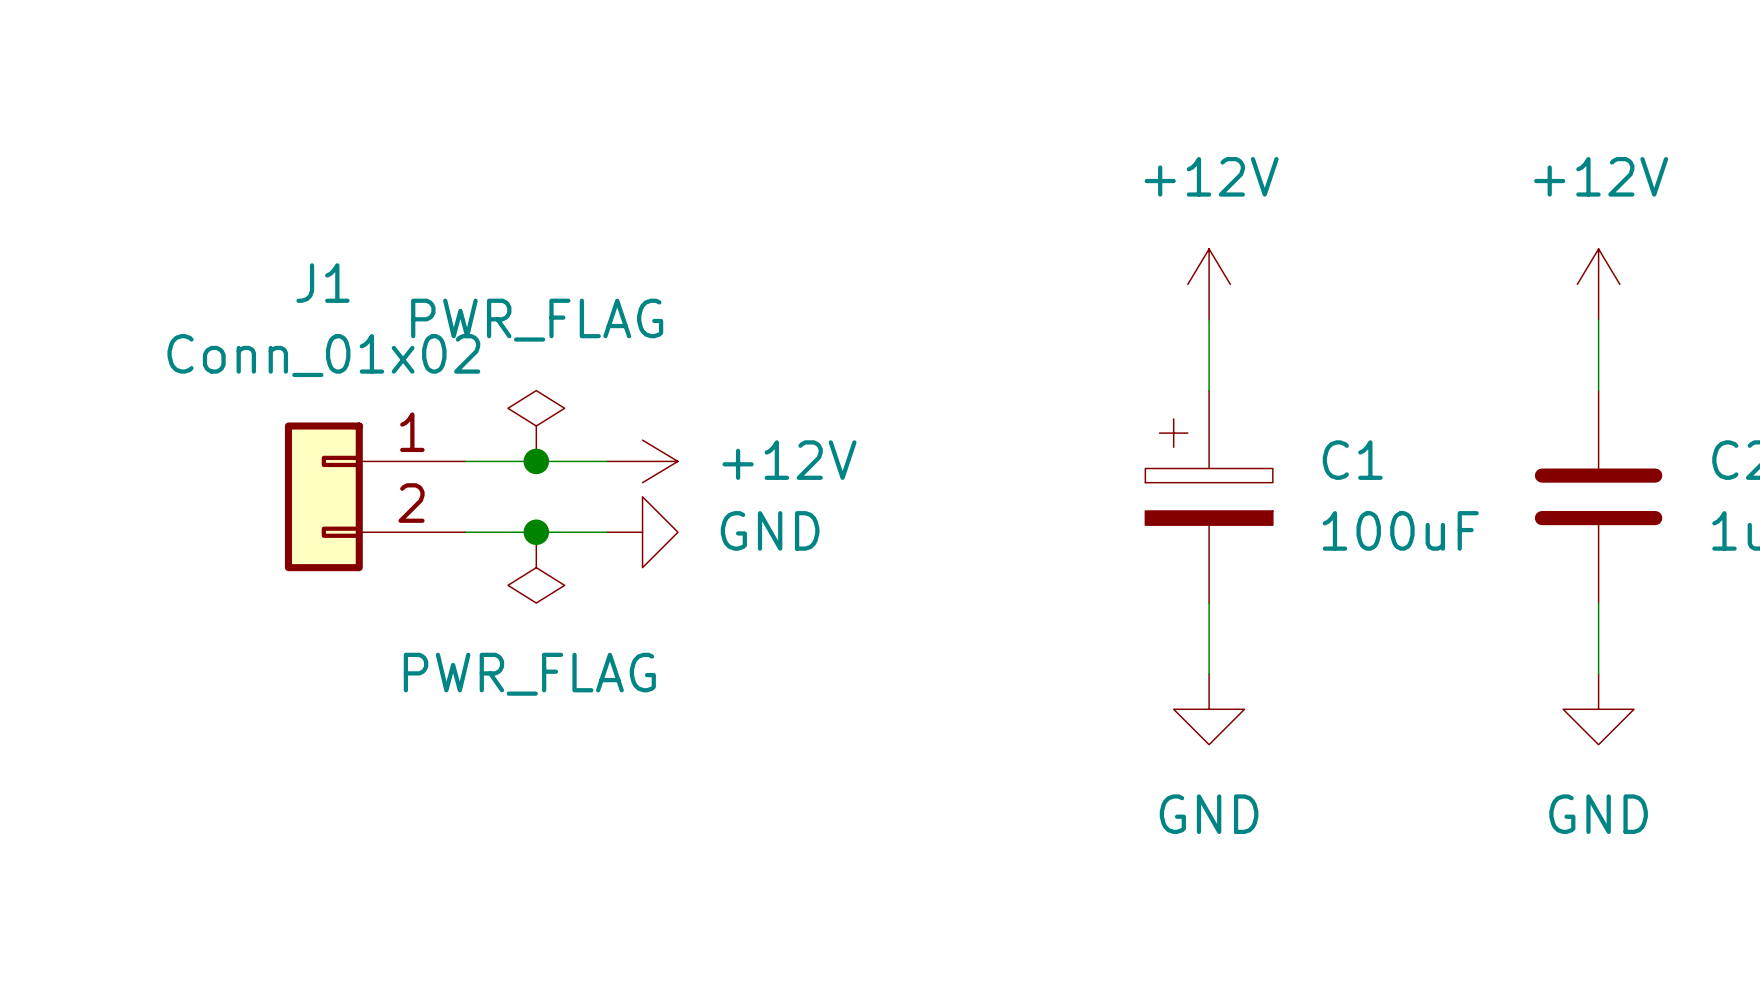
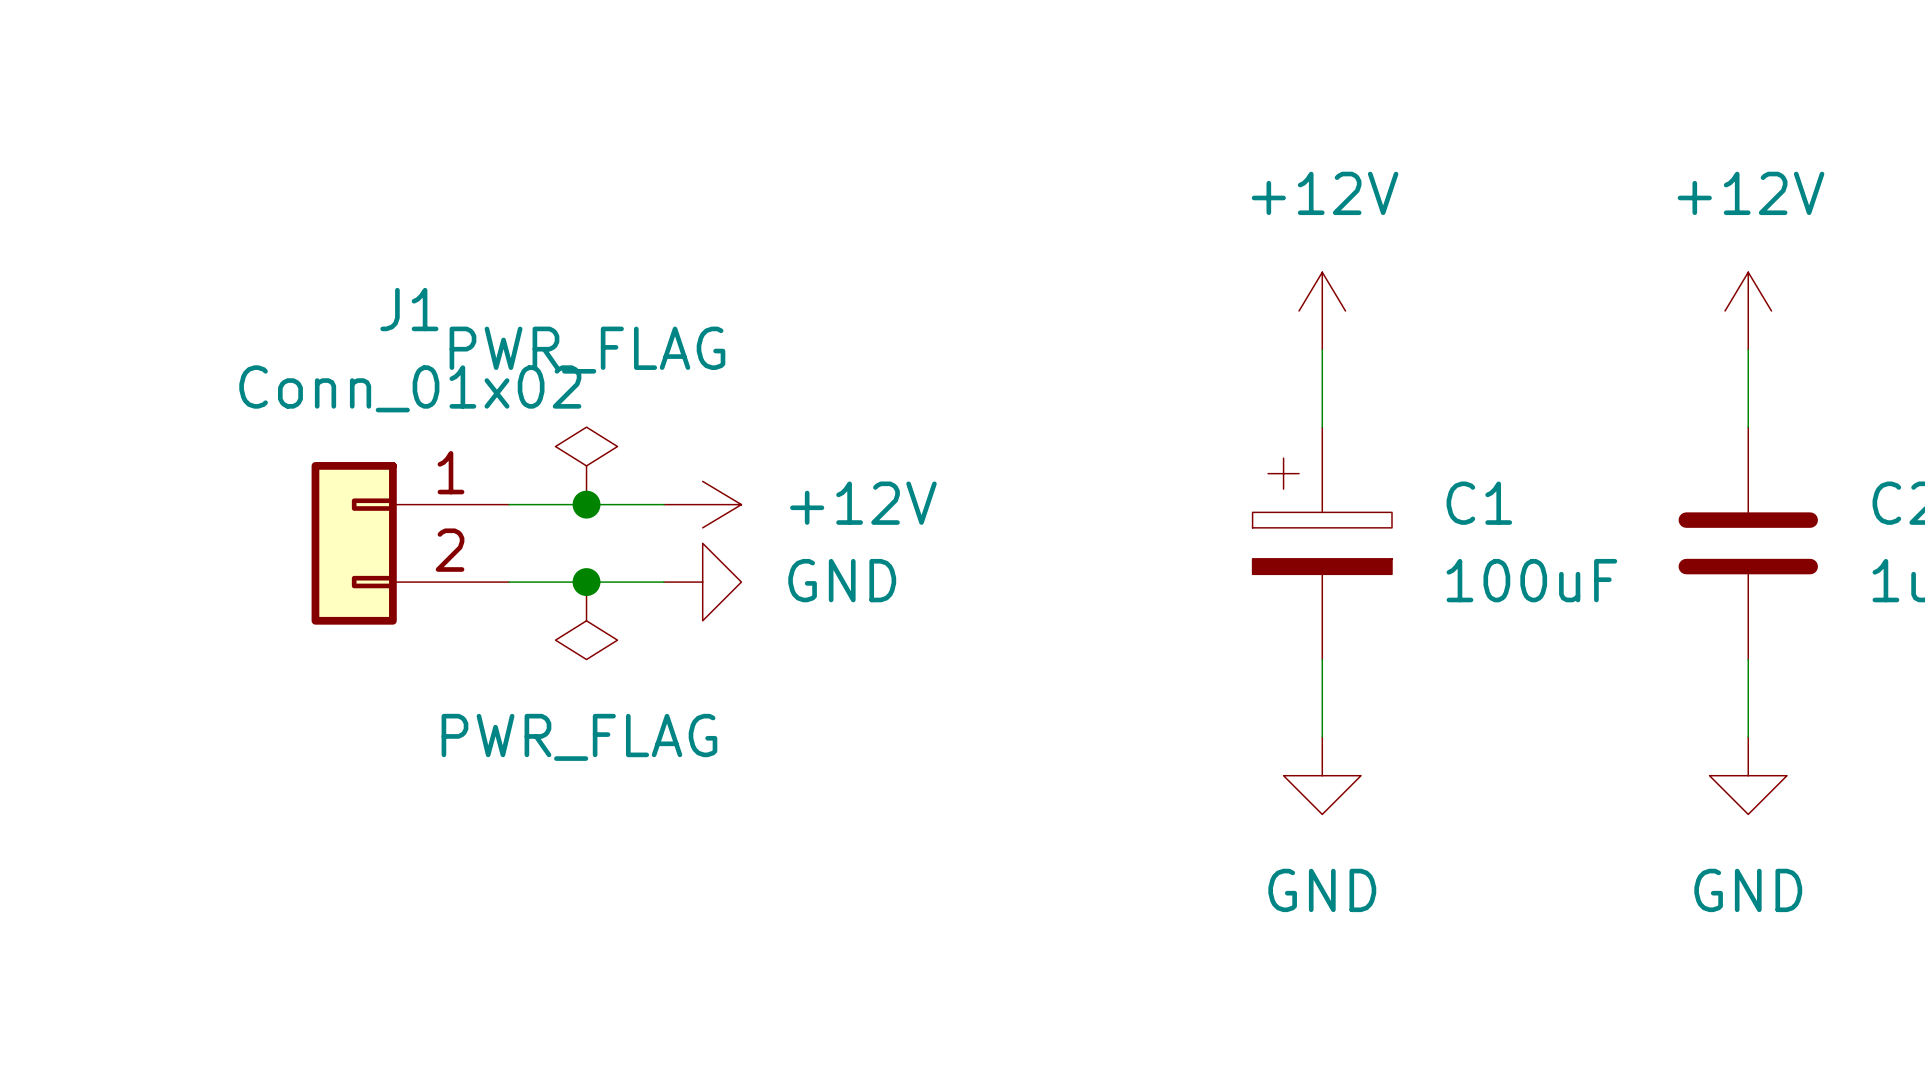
J1 name position: J1 (323, 283) -> J1 (409, 309)
J1 value position: Conn_01x02 (323, 355) -> Conn_01x02 (410, 388)

